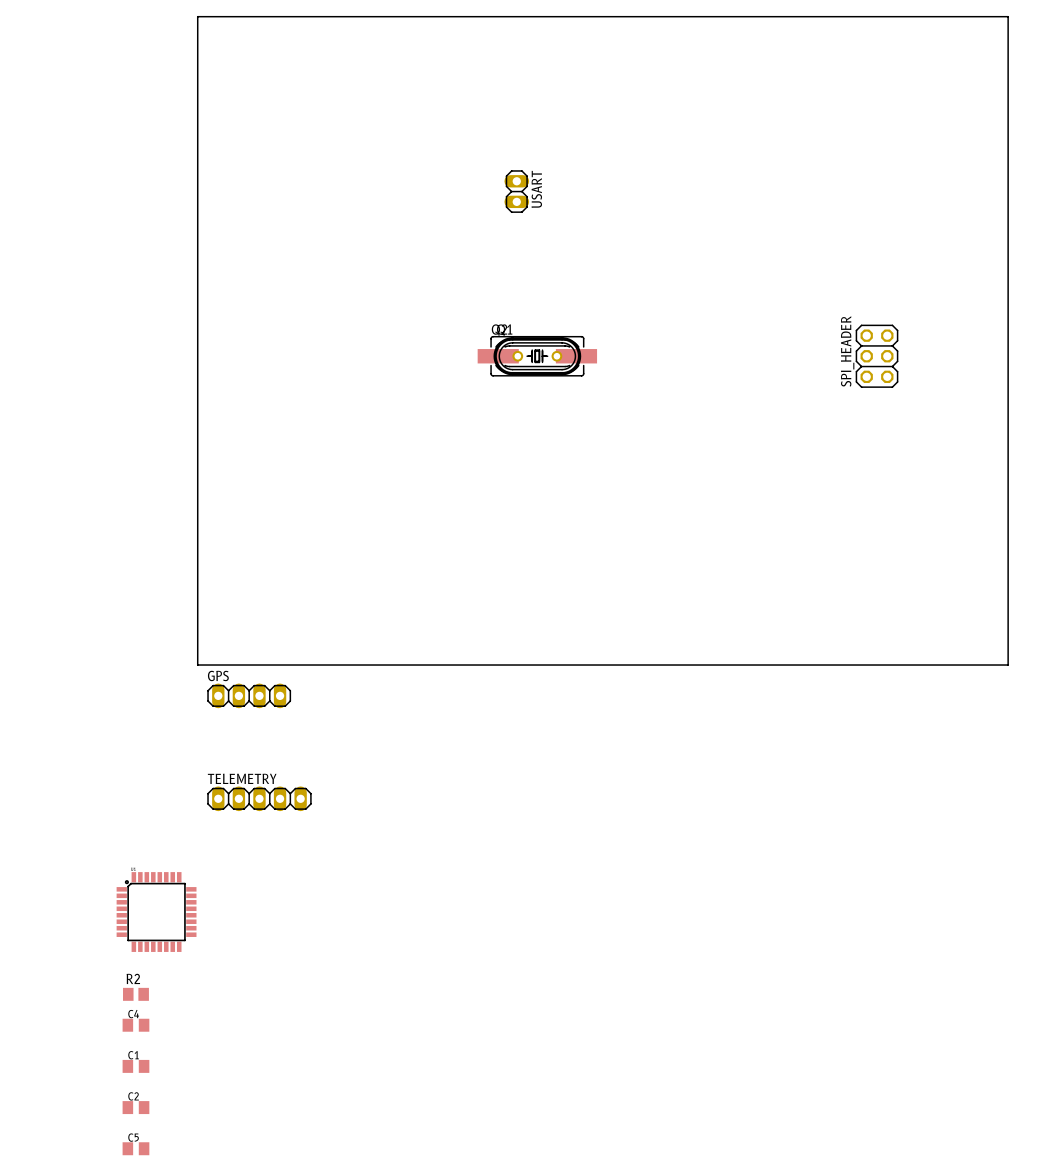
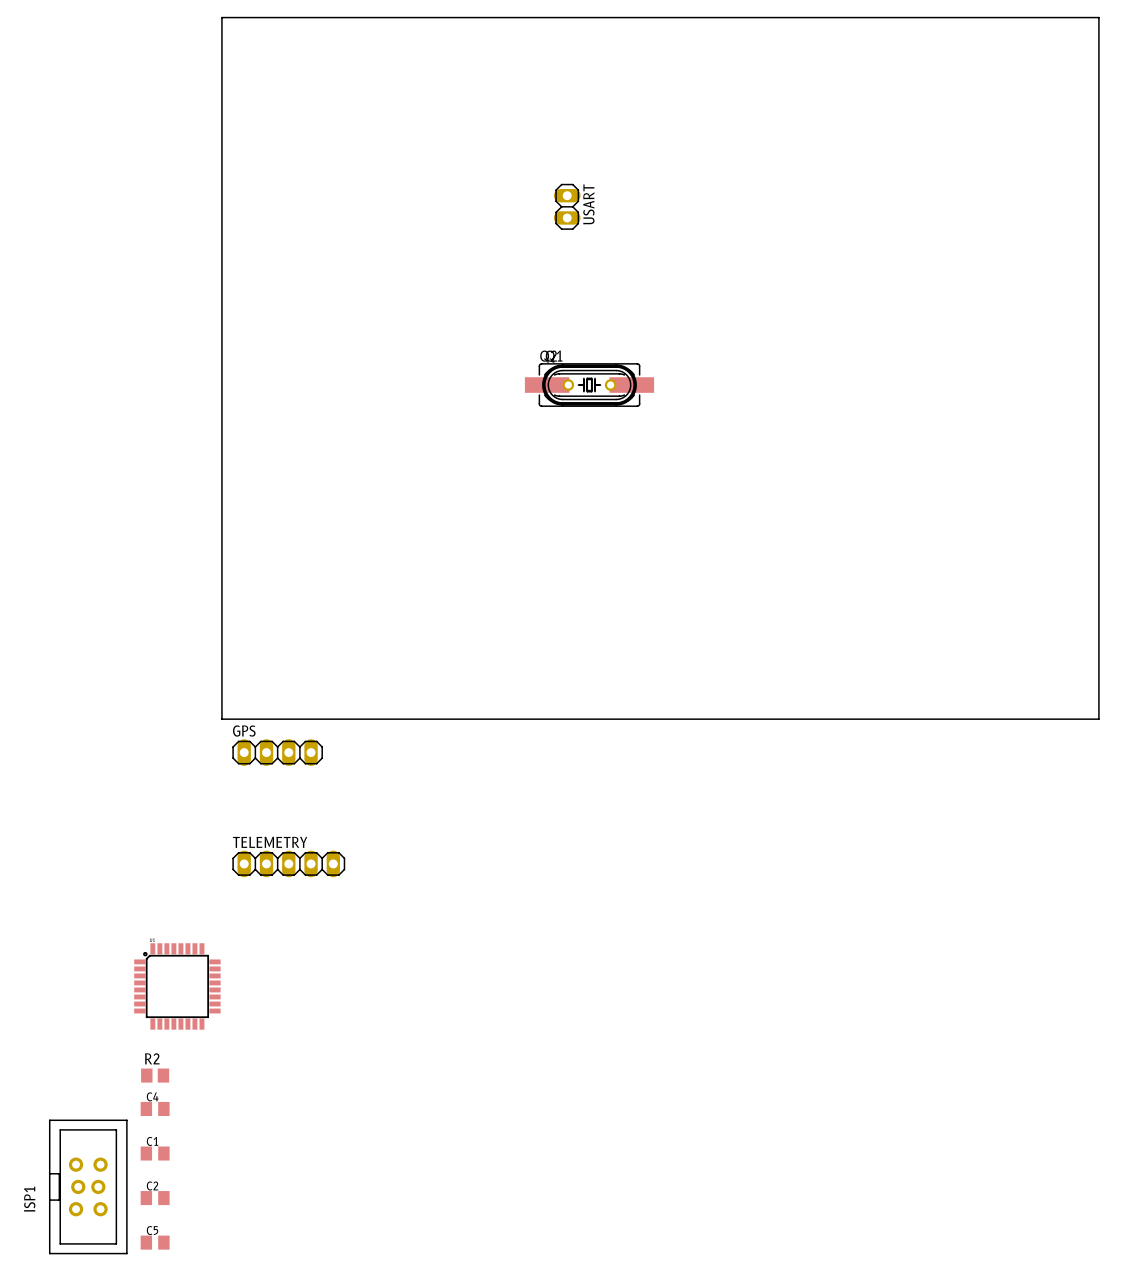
SPI_HEADER: (877, 356) -> none
ISP1: none -> (88, 1186)

